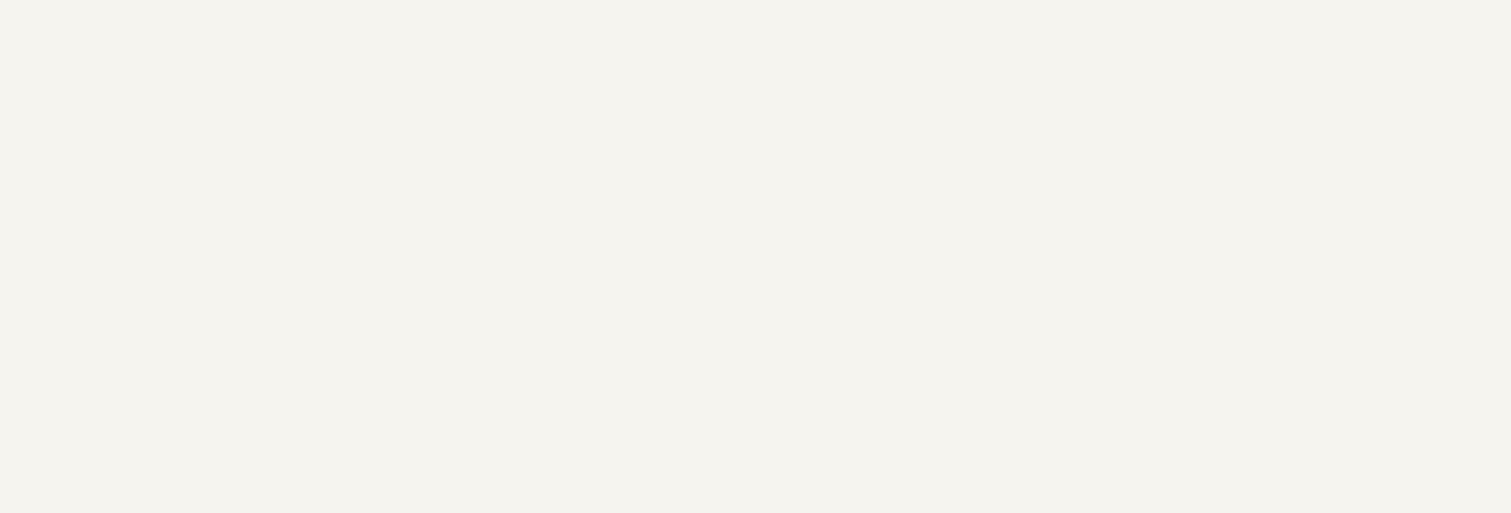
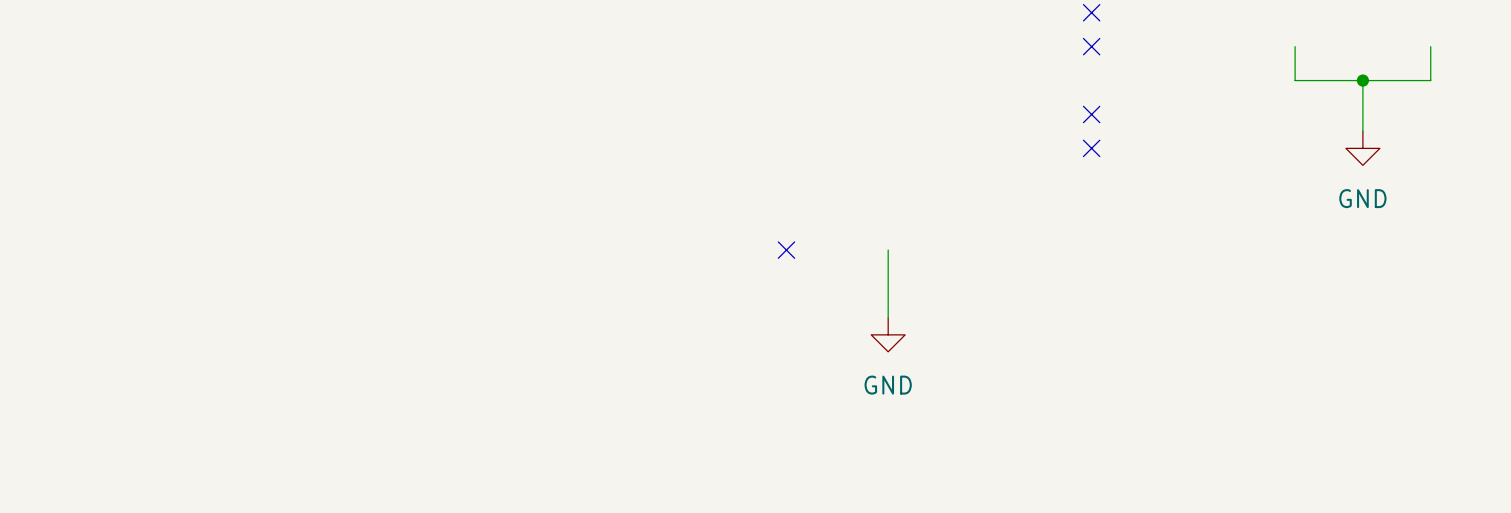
no-connect mark: none -> (1091, 12)
no-connect mark: none -> (1091, 46)
wire: none -> (1295, 46) (1295, 80) (1430, 80) (1430, 46)
wire: none -> (1362, 80) (1362, 131)
junction: none -> (1362, 80)
no-connect mark: none -> (1091, 114)
no-connect mark: none -> (1091, 148)
power symbol: none -> GND (1362, 148)
no-connect mark: none -> (786, 250)
wire: none -> (888, 250) (888, 317)
power symbol: none -> GND (888, 334)

